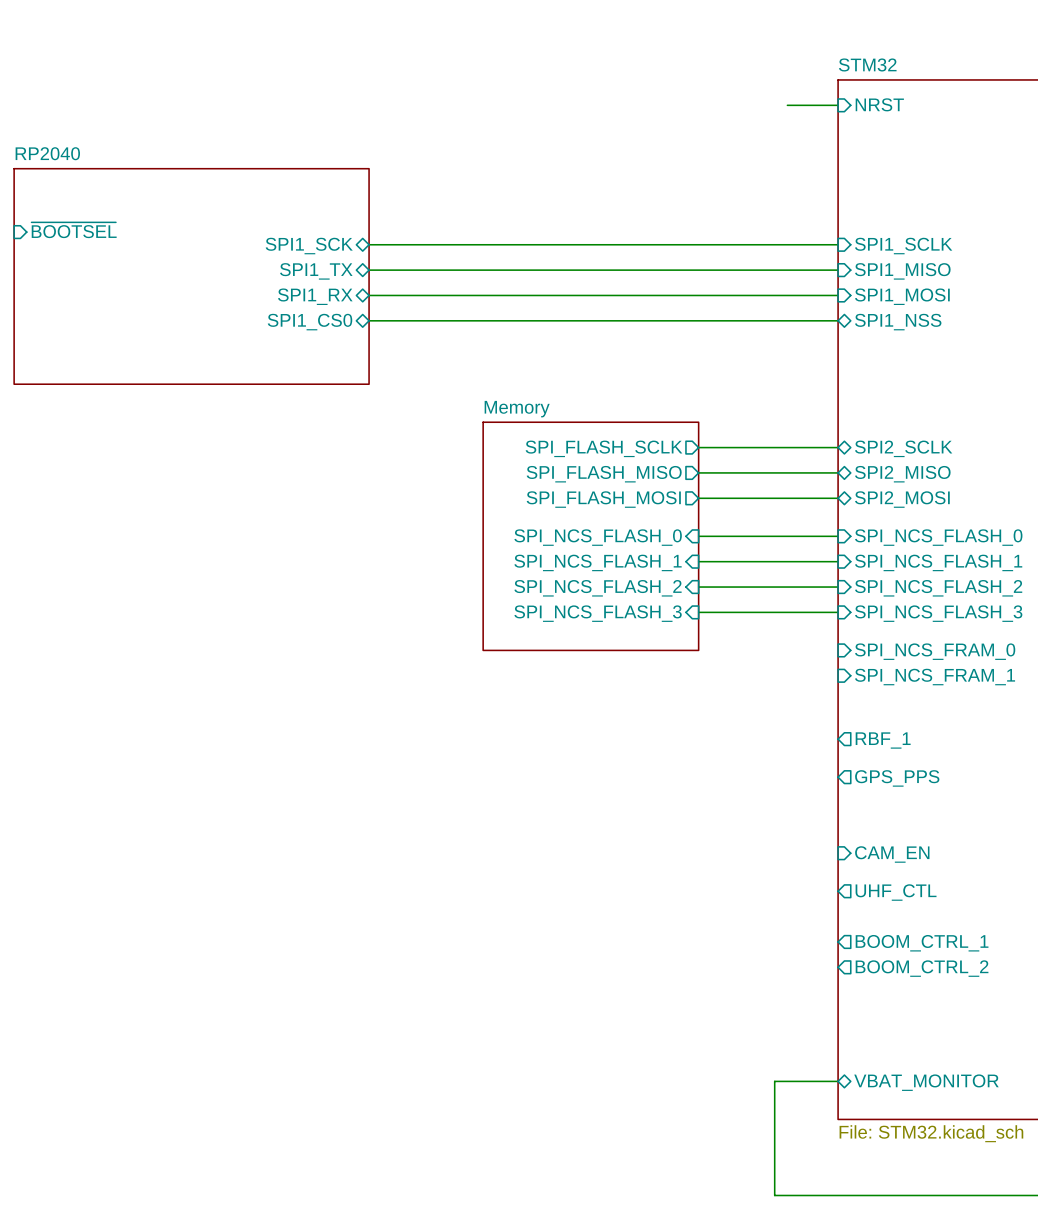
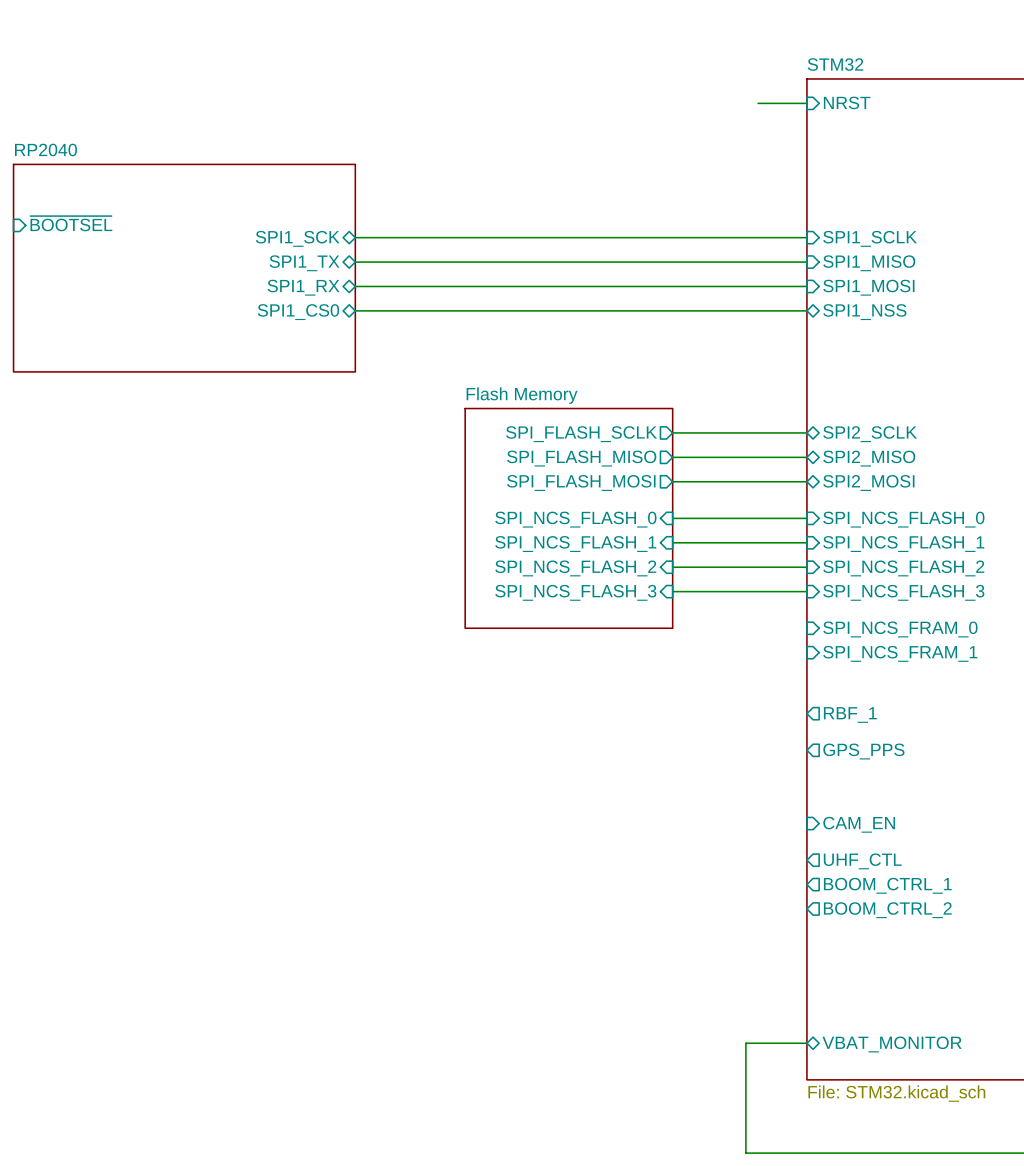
sheet Memory name: Memory (517, 409) -> Flash Memory (522, 395)
sheet pin: none -> BOOM_CTRL_1 (887, 885)
sheet pin: BOOM_CTRL_1 (922, 943) -> BOOM_CTRL_2 (887, 910)
sheet pin: BOOM_CTRL_2 (922, 968) -> none

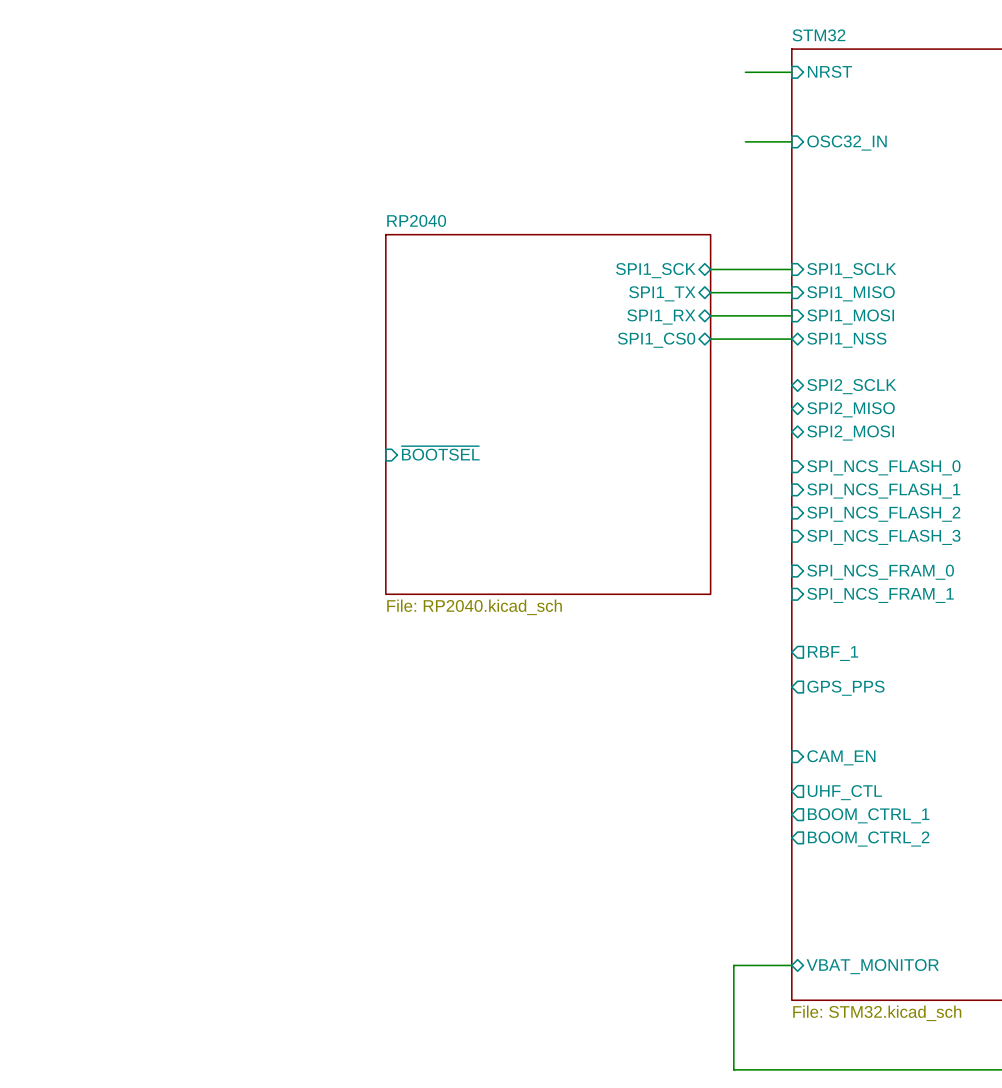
sheet RP2040 name position: RP2040 (45, 149) -> RP2040 (416, 220)
sheet RP2040 shape: [12, 163, 357, 373] -> [385, 233, 712, 595]
wire: none -> (745, 141) (791, 141)
sheet pin: none -> OSC32_IN (847, 143)
sheet pin: ~{BOOTSEL} (71, 223) -> none
wire: (355, 237) (806, 237) -> none
sheet pin: SPI1_SCK (297, 238) -> none
sheet pin: SPI1_SCLK (870, 238) -> none
wire: (355, 262) (806, 262) -> none
sheet pin: SPI1_TX (304, 263) -> none
sheet pin position: SPI1_MISO (869, 263) -> SPI1_MISO (851, 293)
wire: (355, 286) (806, 286) -> none
sheet pin: SPI1_RX (303, 287) -> none
sheet pin position: SPI1_MOSI (868, 287) -> SPI1_MOSI (850, 317)
wire: (355, 310) (721, 310) -> none
sheet pin: SPI1_CS0 (298, 312) -> none
sheet pin: none -> SPI1_SCK (655, 270)
sheet pin shape: bidirectional (864, 312) -> input (851, 270)
sheet pin: SPI1_NSS (864, 312) -> SPI1_SCLK (851, 270)
wire: none -> (710, 292) (791, 292)
sheet pin: none -> SPI1_TX (662, 293)
wire: none -> (710, 315) (791, 315)
sheet pin: none -> SPI1_RX (661, 317)
wire: none -> (710, 339) (791, 339)
sheet pin: none -> SPI1_CS0 (656, 340)
sheet pin: none -> SPI1_NSS (846, 340)
wire: (672, 432) (806, 432) -> none
sheet pin: SPI_FLASH_SCLK (581, 434) -> none
wire: (672, 457) (806, 457) -> none
sheet pin: SPI_FLASH_MISO (581, 458) -> none
wire: (672, 481) (806, 481) -> none
sheet pin: SPI_FLASH_MOSI (581, 482) -> none
sheet pin: none -> ~{BOOTSEL} (440, 453)
sheet Flash Memory: (568, 518) -> none
wire: (672, 518) (806, 518) -> none
sheet pin: SPI_NCS_FLASH_0 (575, 519) -> none
wire: (672, 542) (806, 542) -> none
sheet pin: SPI_NCS_FLASH_1 (575, 544) -> none
wire: (672, 567) (806, 567) -> none
sheet pin: SPI_NCS_FLASH_2 (575, 568) -> none
wire: (672, 591) (806, 591) -> none
sheet pin: SPI_NCS_FLASH_3 (575, 592) -> none
sheet RP2040 value: none -> File: RP2040.kicad_sch (474, 607)

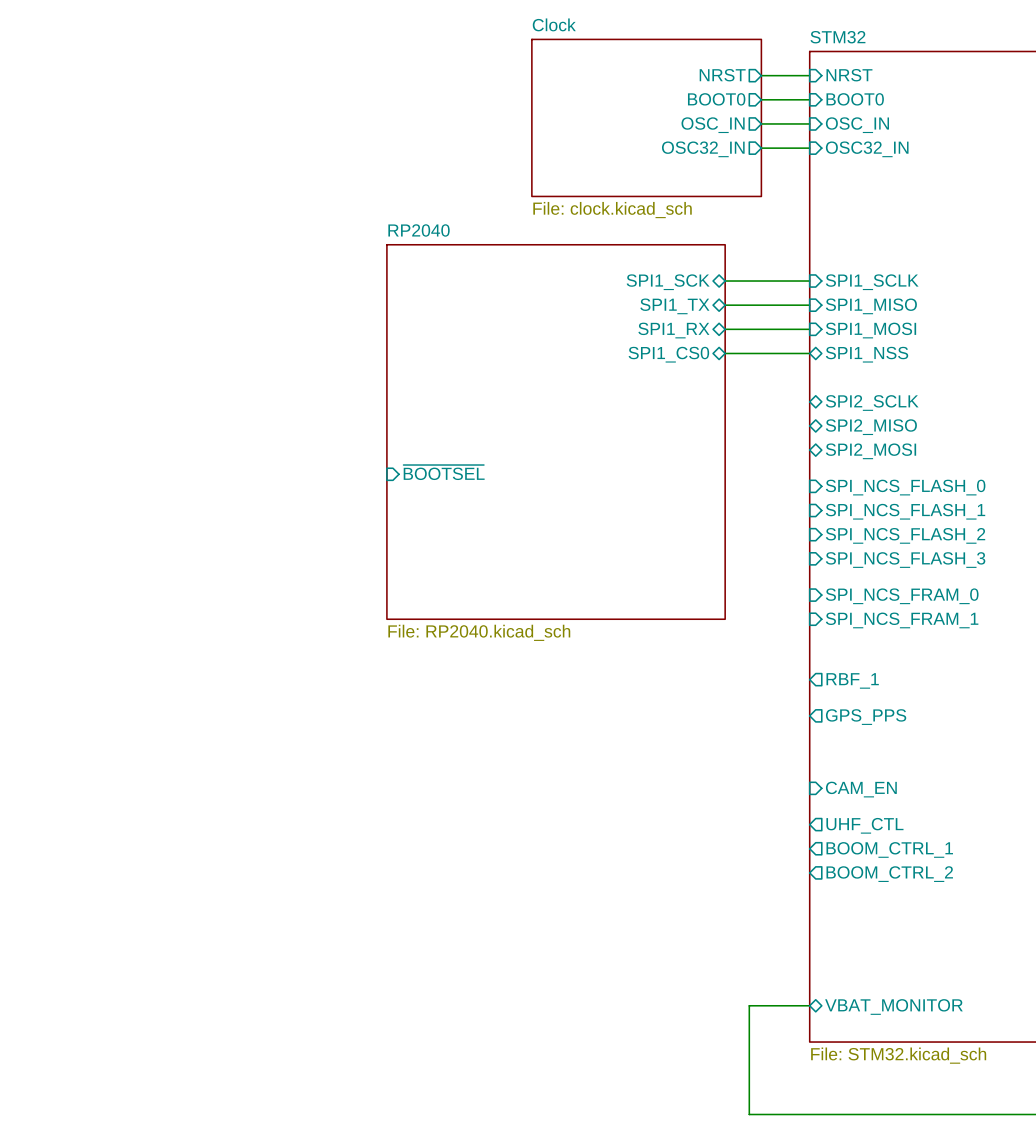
sheet pin: none -> NRST (722, 75)
sheet pin: none -> BOOT0 (716, 99)
wire: none -> (761, 99) (809, 99)
sheet pin: none -> BOOT0 (855, 99)
sheet Clock: none -> File: clock.kicad_sch (646, 117)
wire: none -> (761, 123) (809, 123)
sheet pin: none -> OSC_IN (713, 125)
sheet pin: none -> OSC_IN (857, 125)
sheet pin: none -> OSC32_IN (703, 149)

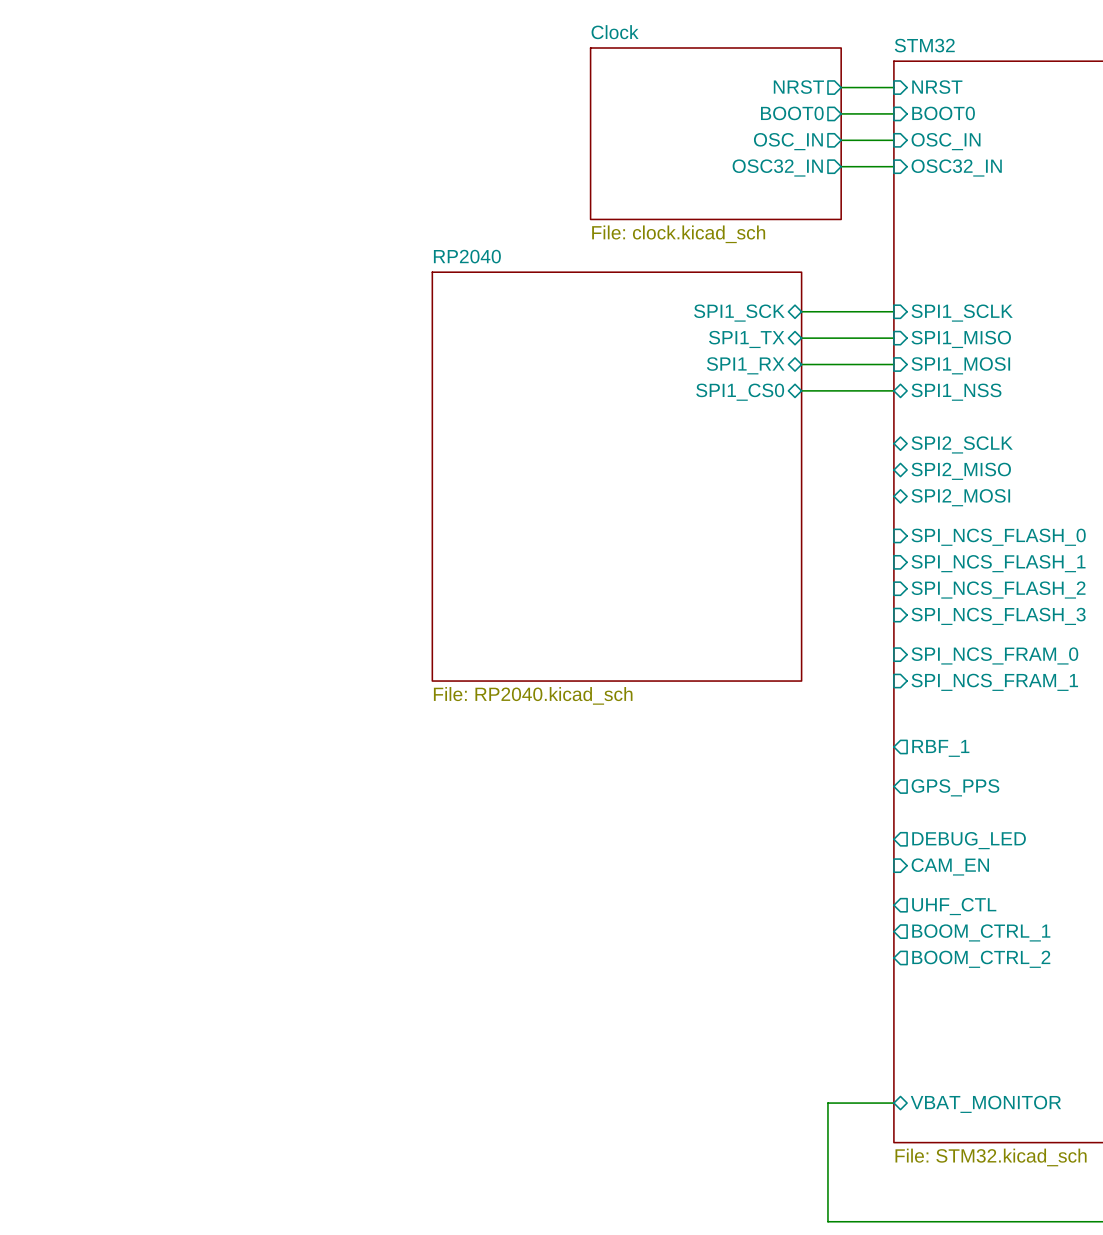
sheet pin: ~{BOOTSEL} (444, 472) -> none
sheet pin: none -> DEBUG_LED (969, 840)

